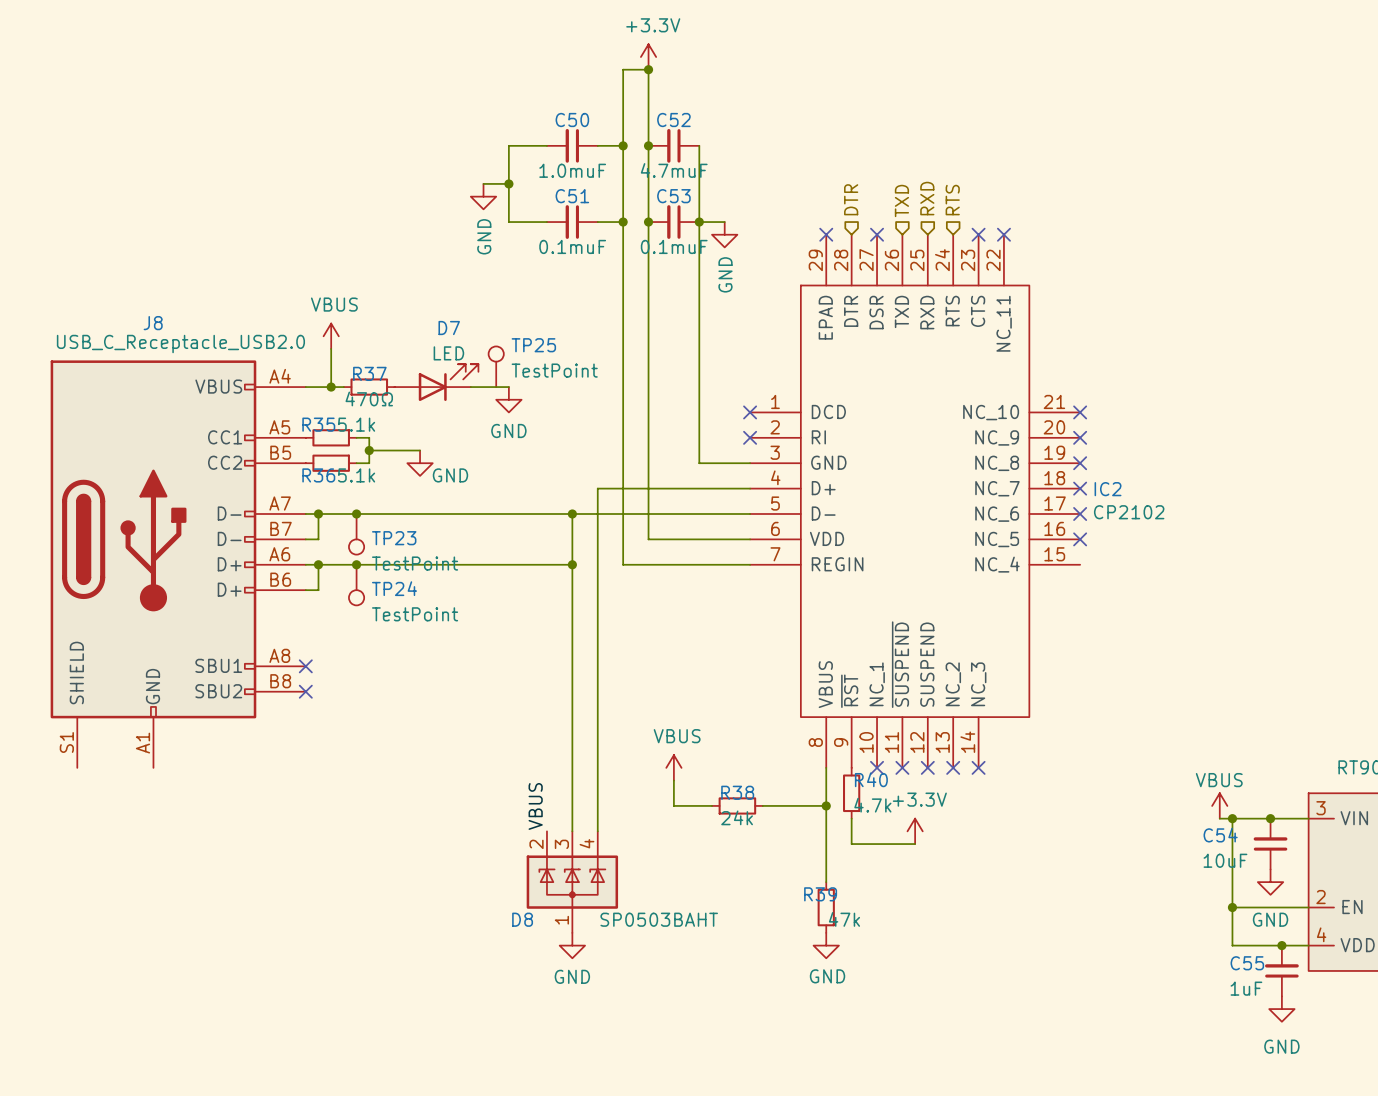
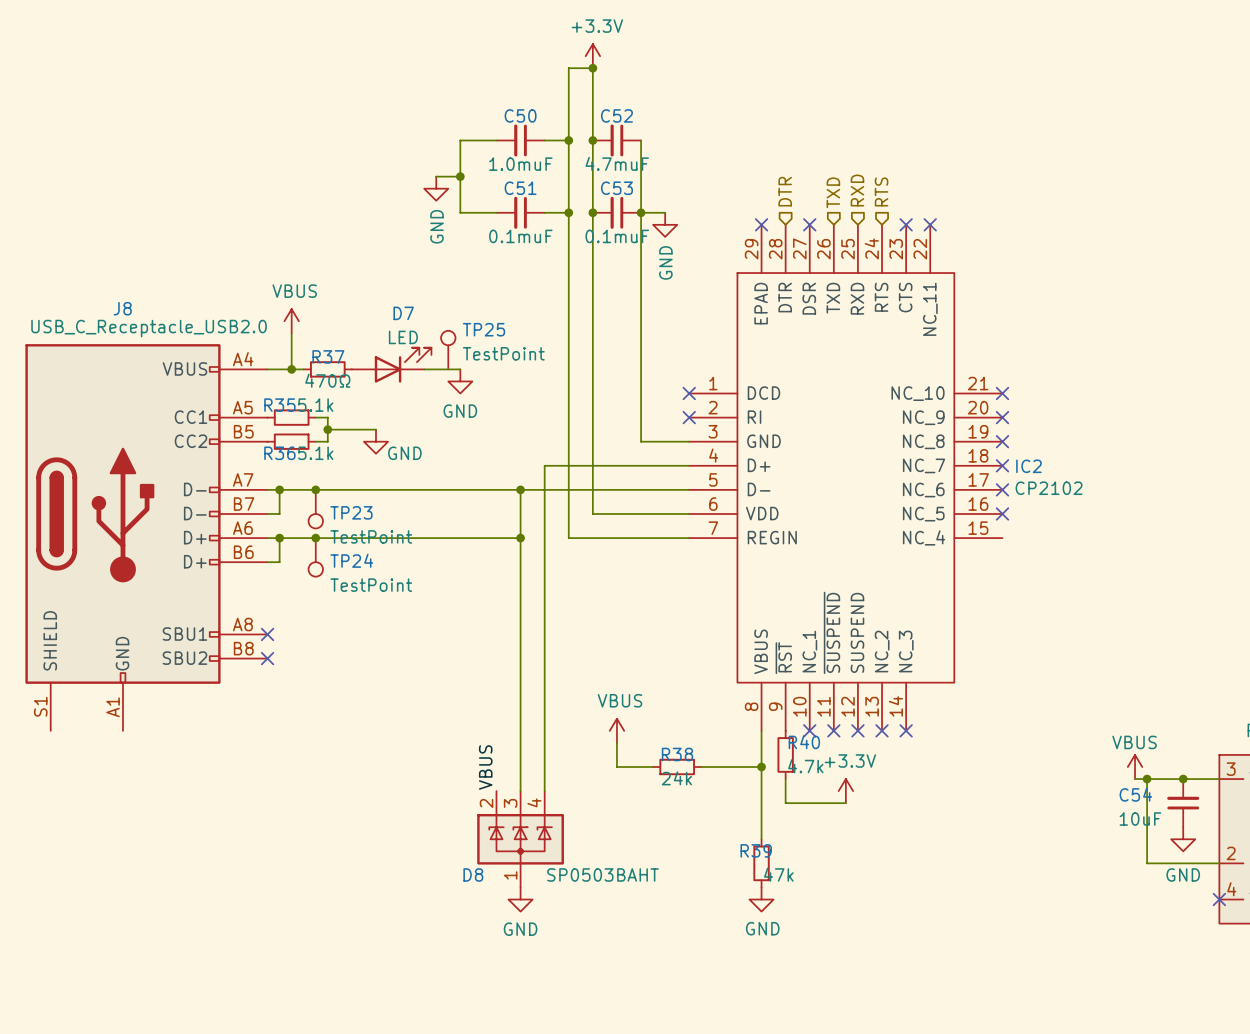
wire: (1232, 907) (1232, 945) (1308, 945) -> none
junction: (1232, 907) -> none
junction: (1281, 945) -> none
no-connect mark: none -> (1219, 899)
C55: 1uF (1281, 970) -> none
power symbol: GND (1281, 1009) -> none

